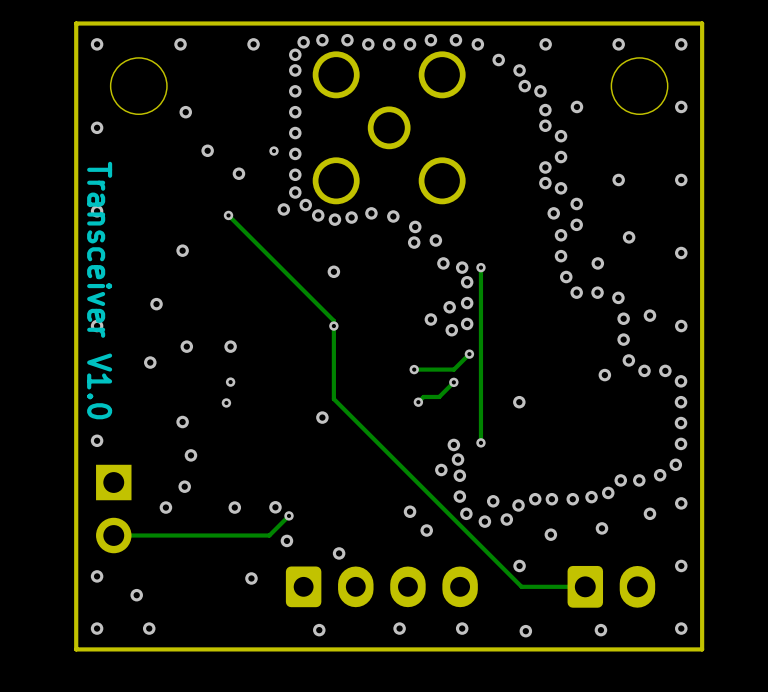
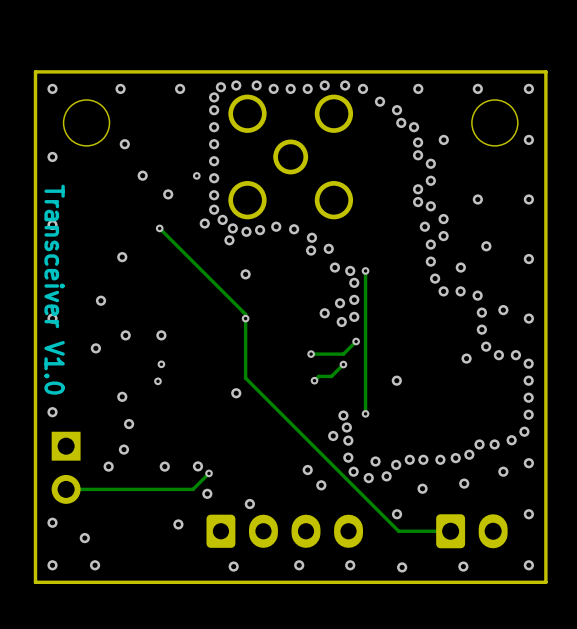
via: none -> (229, 240)

